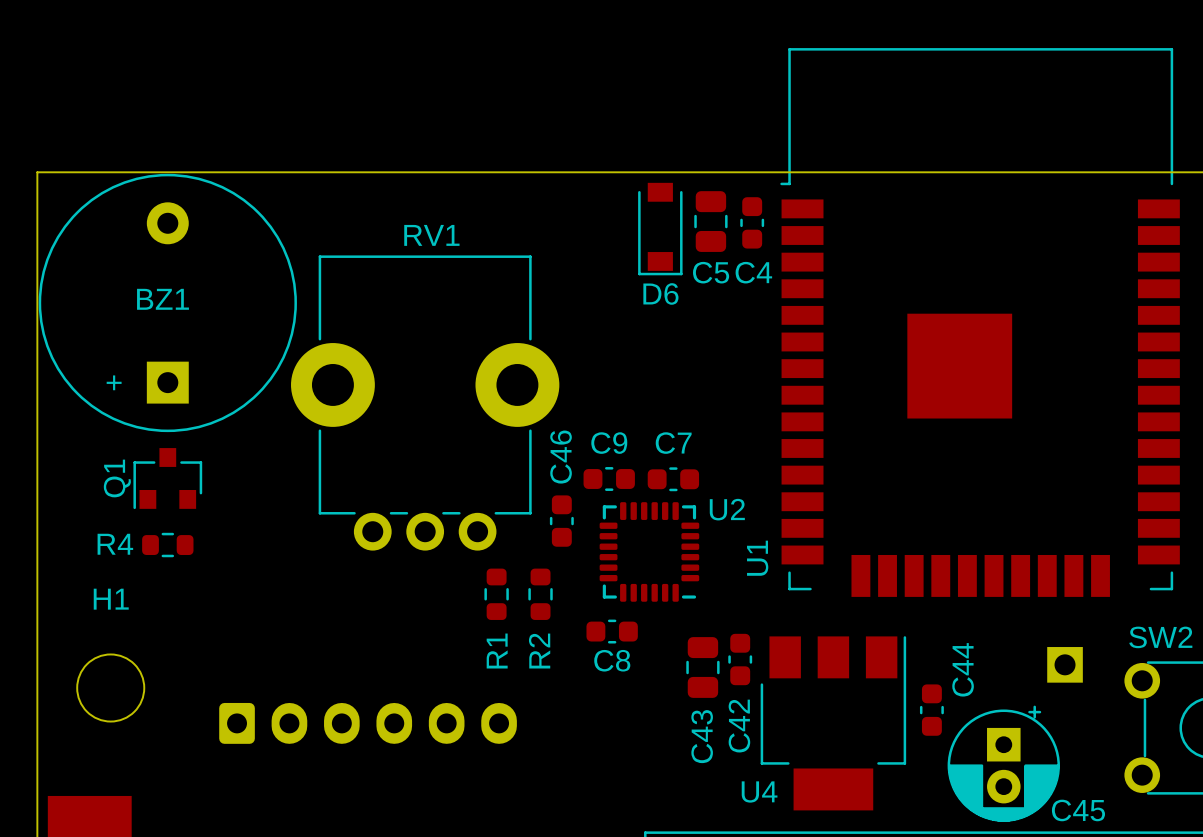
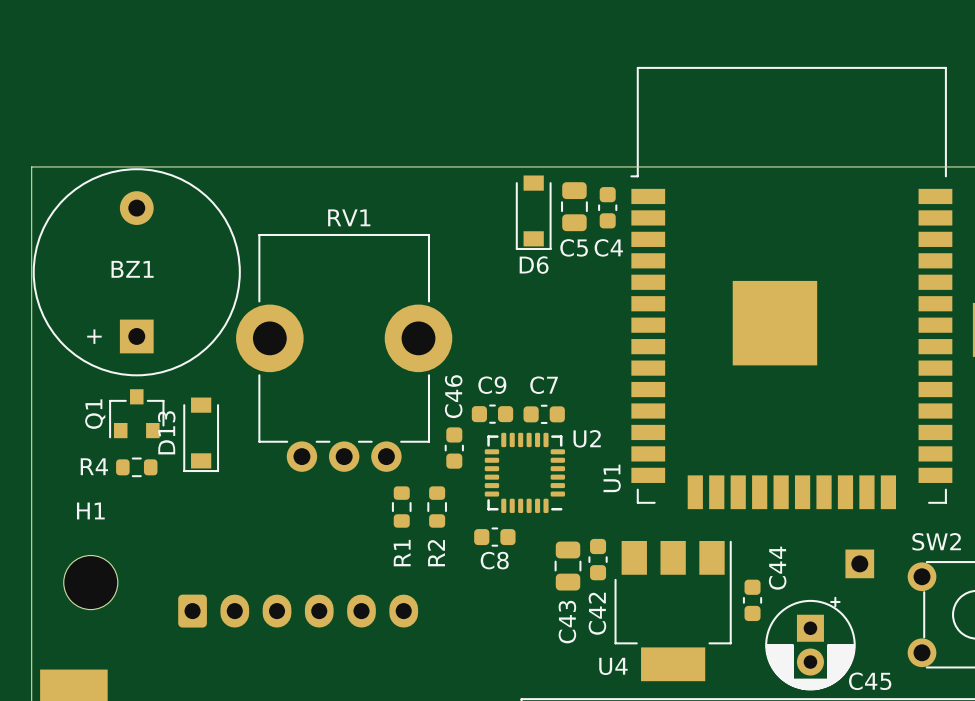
D13: none -> (201, 434)

